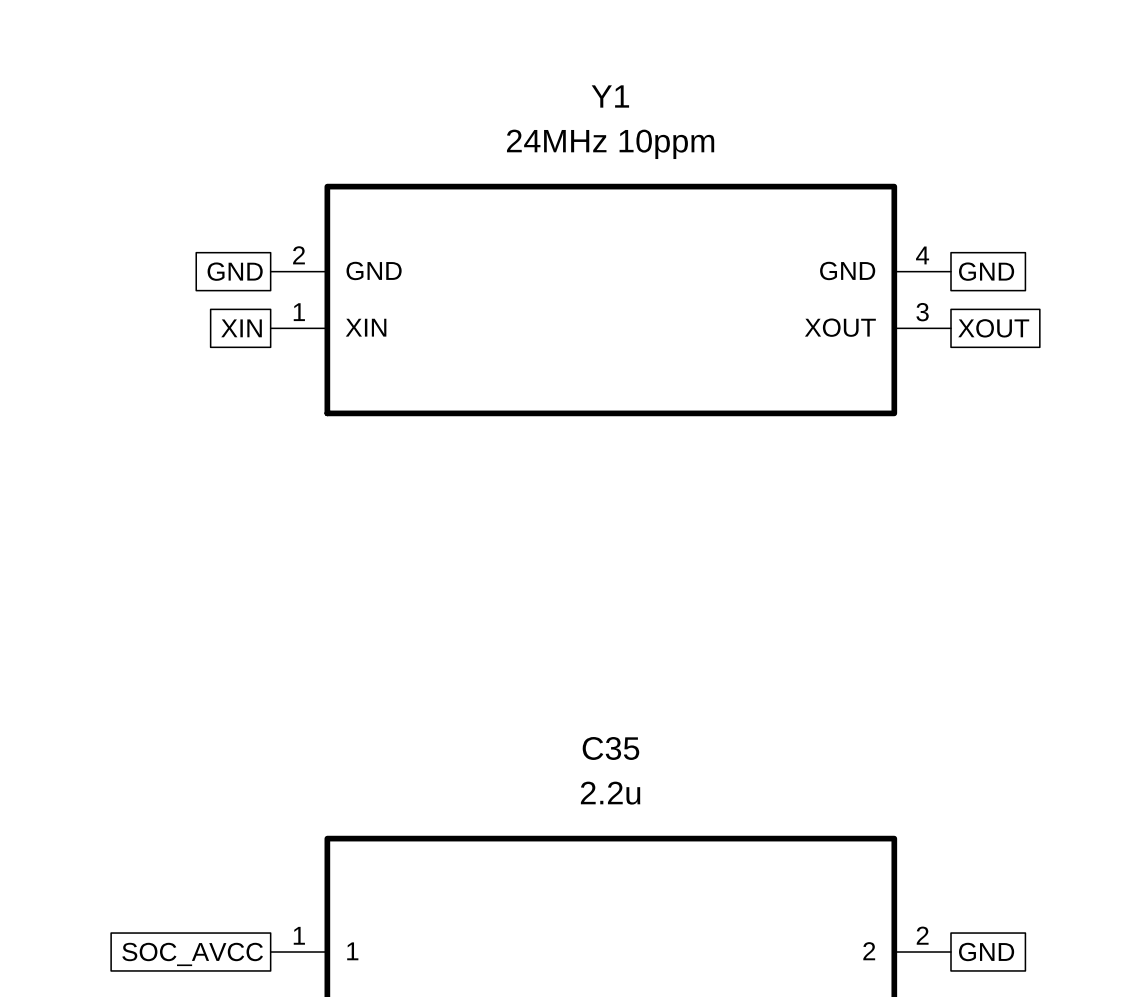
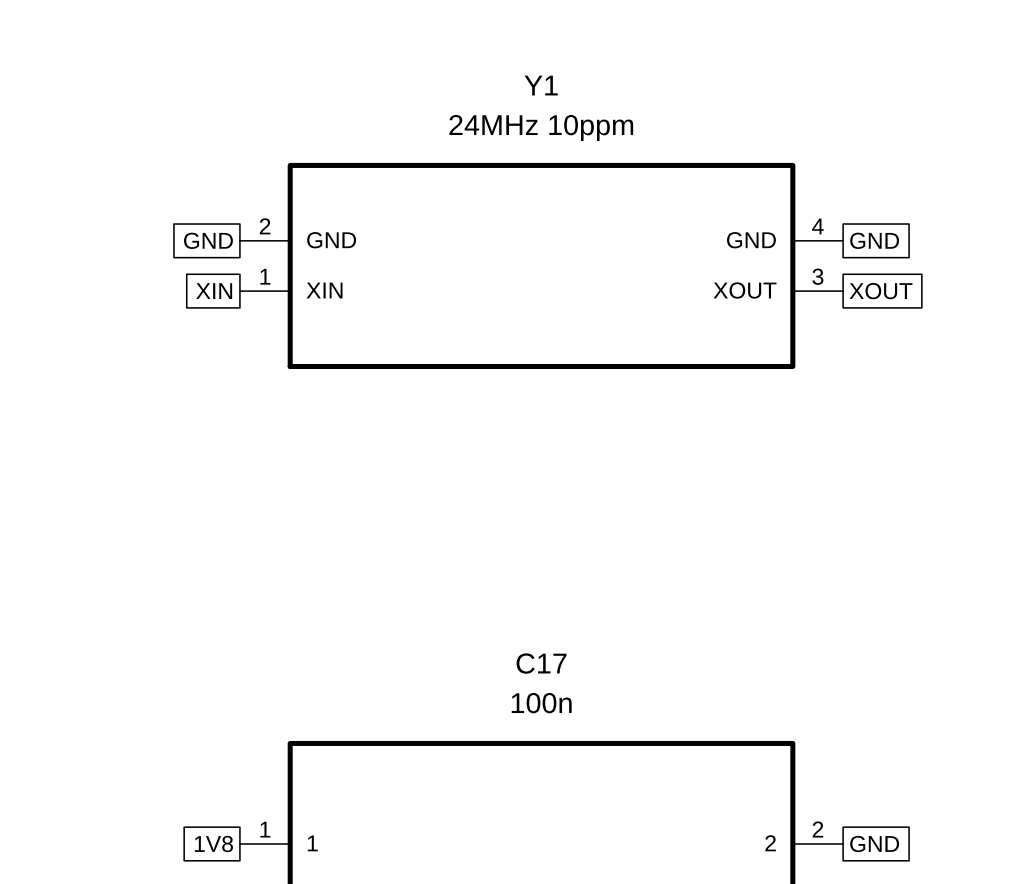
C35 name: C35 (610, 748) -> C17 (541, 663)
C35 value: 2.2u (610, 793) -> 100n (541, 703)
global label: SOC_AVCC (192, 954) -> 1V8 (213, 843)

